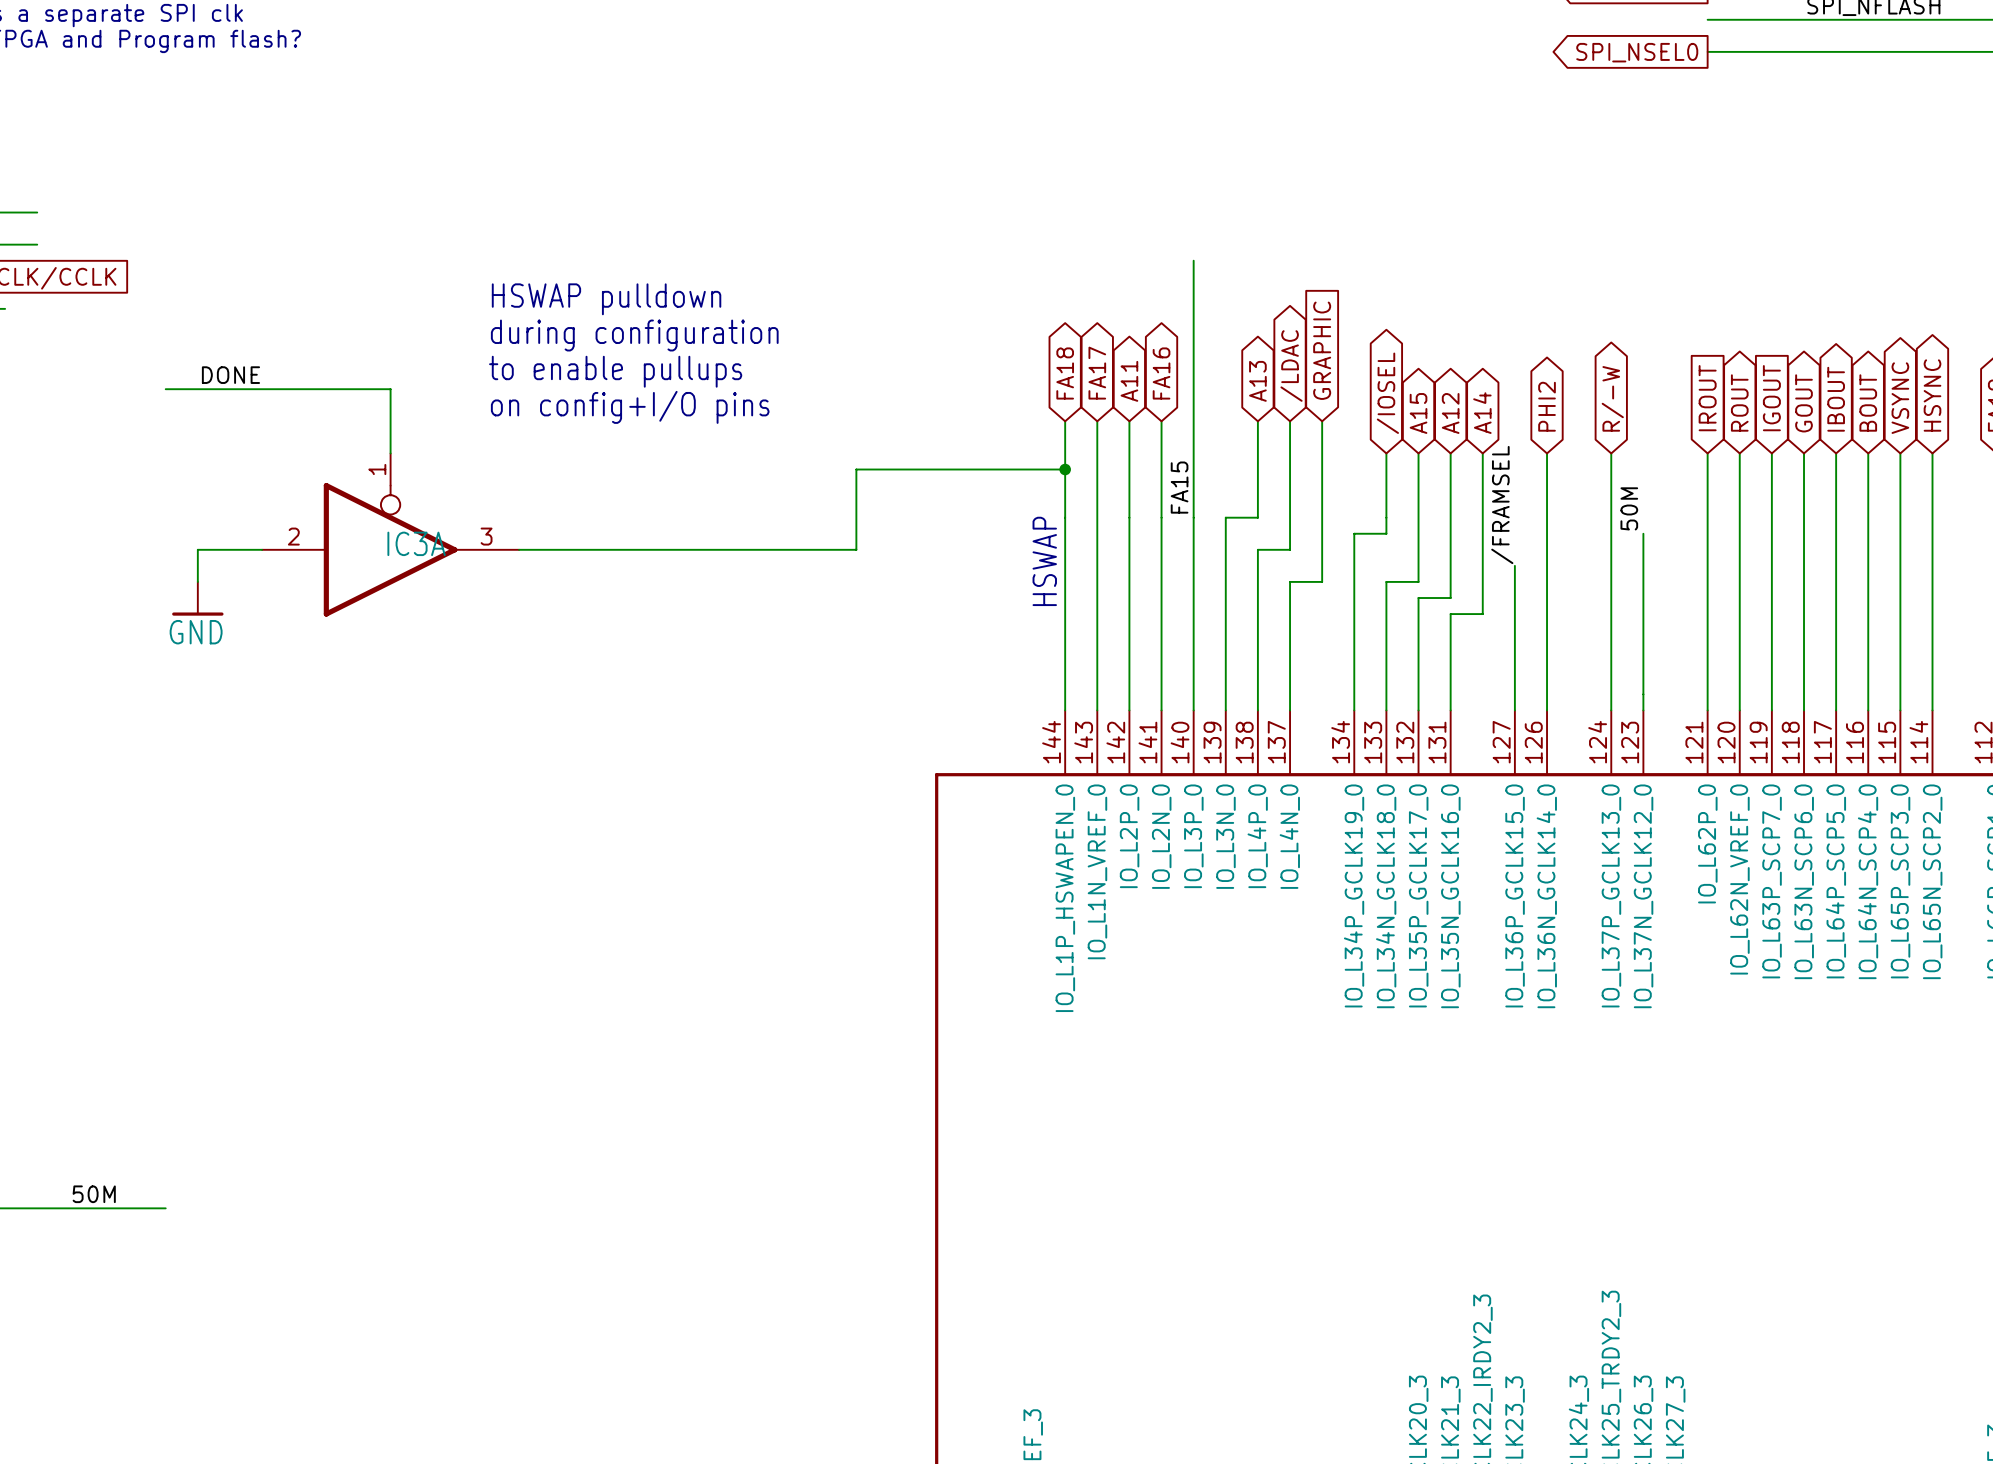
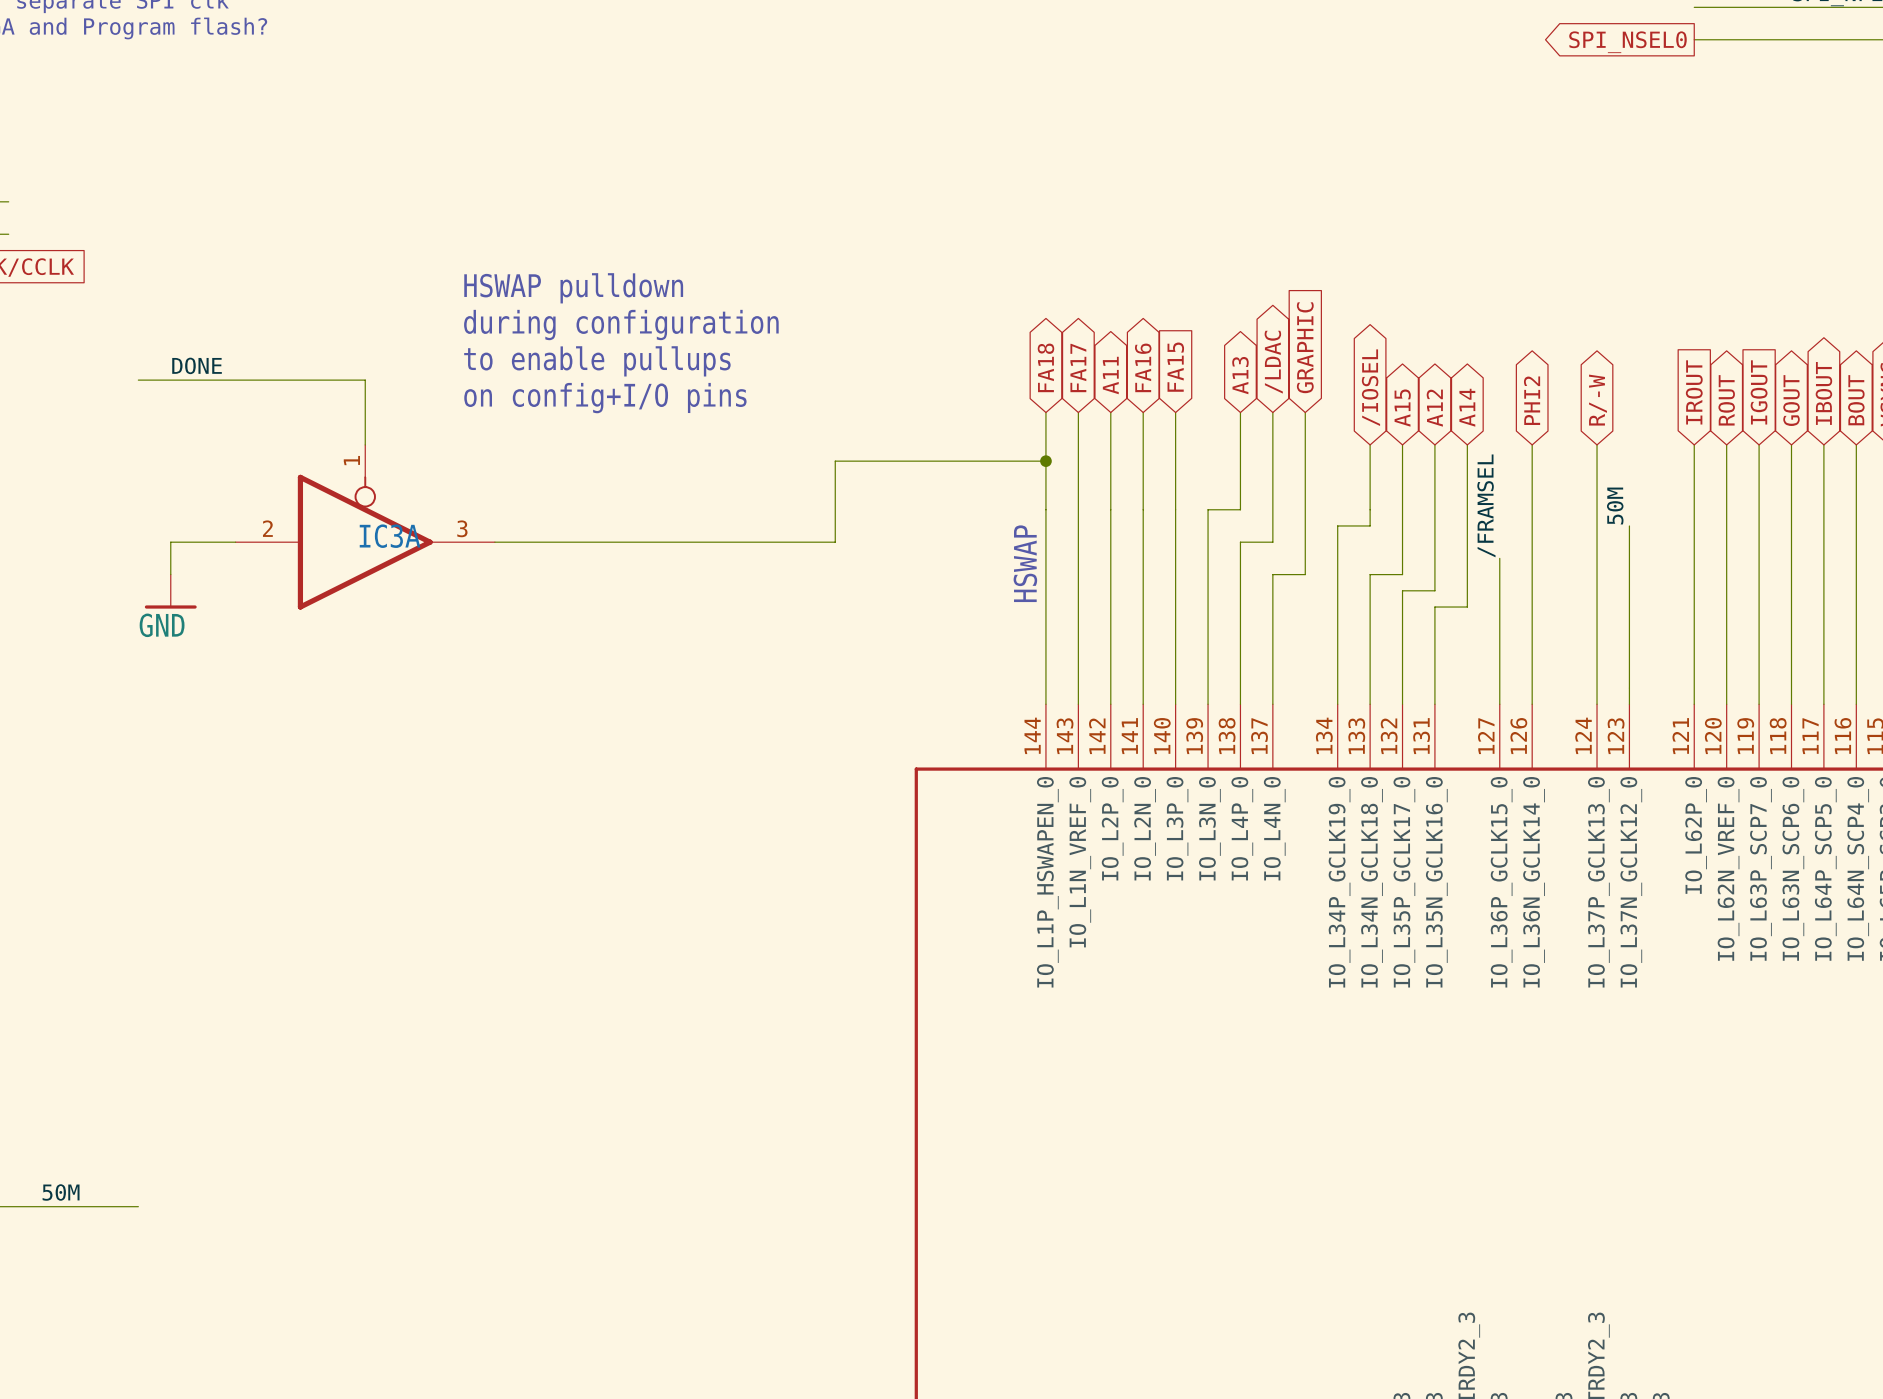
wire: (1193, 260) (1193, 421) -> none
global label: none -> FA15 (1175, 367)
label: FA15 (1179, 487) -> none

